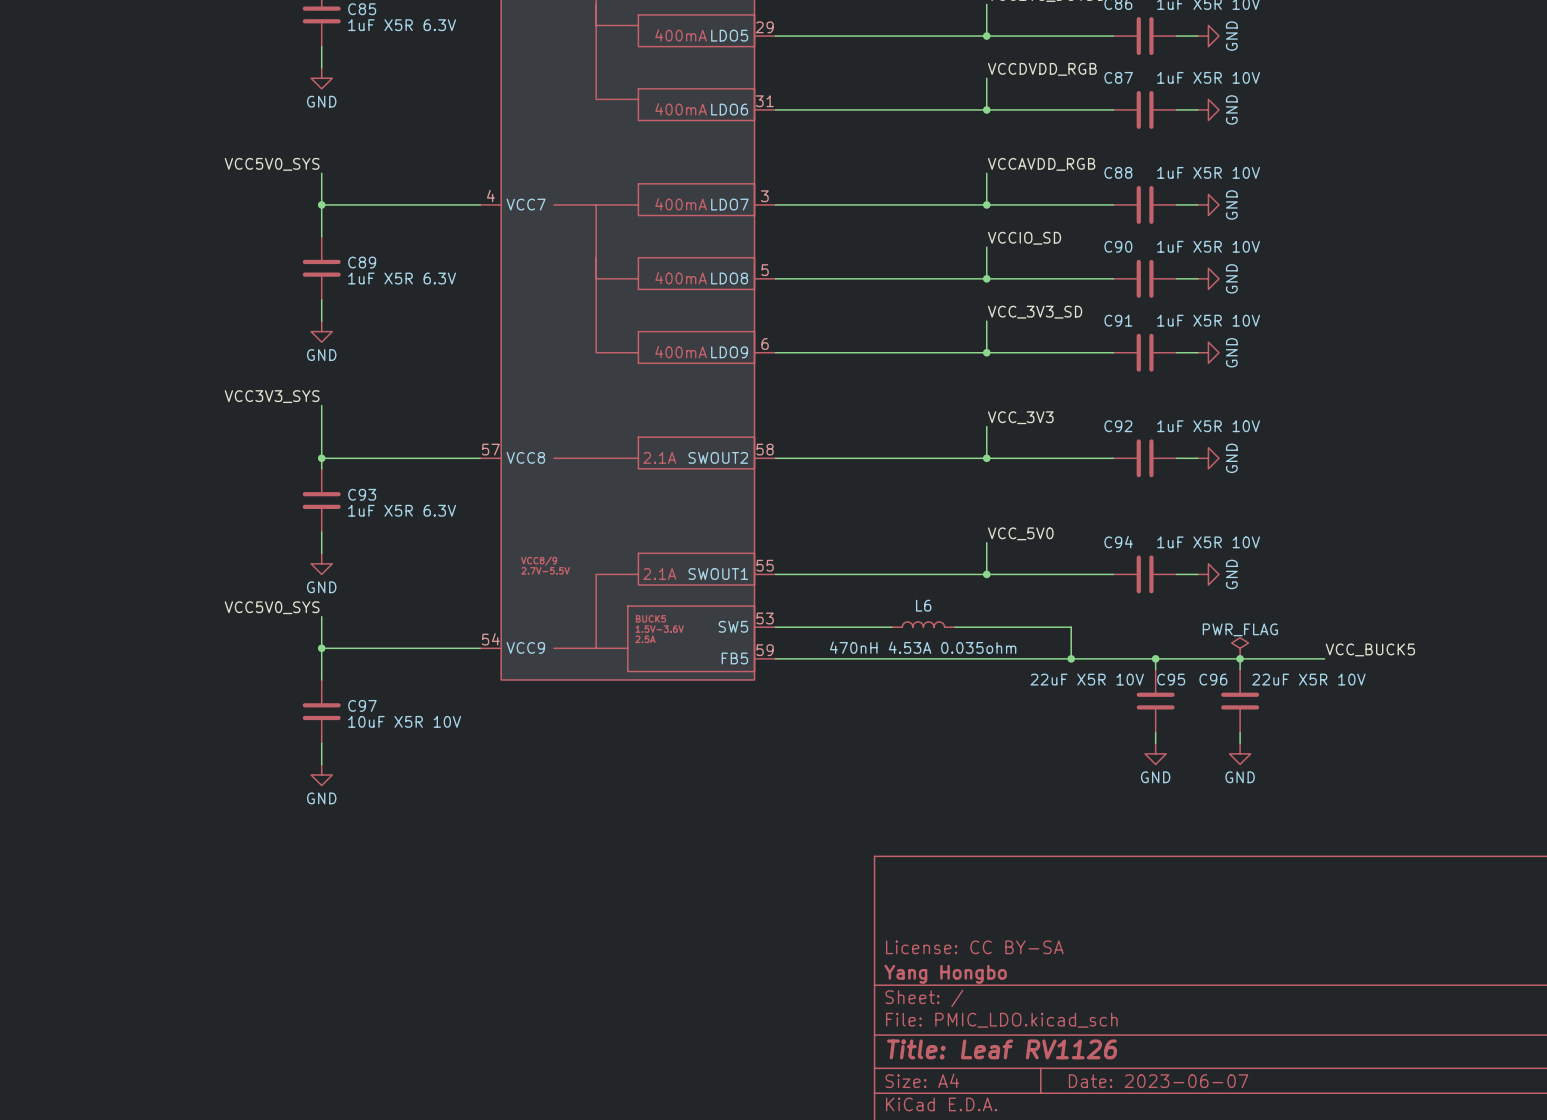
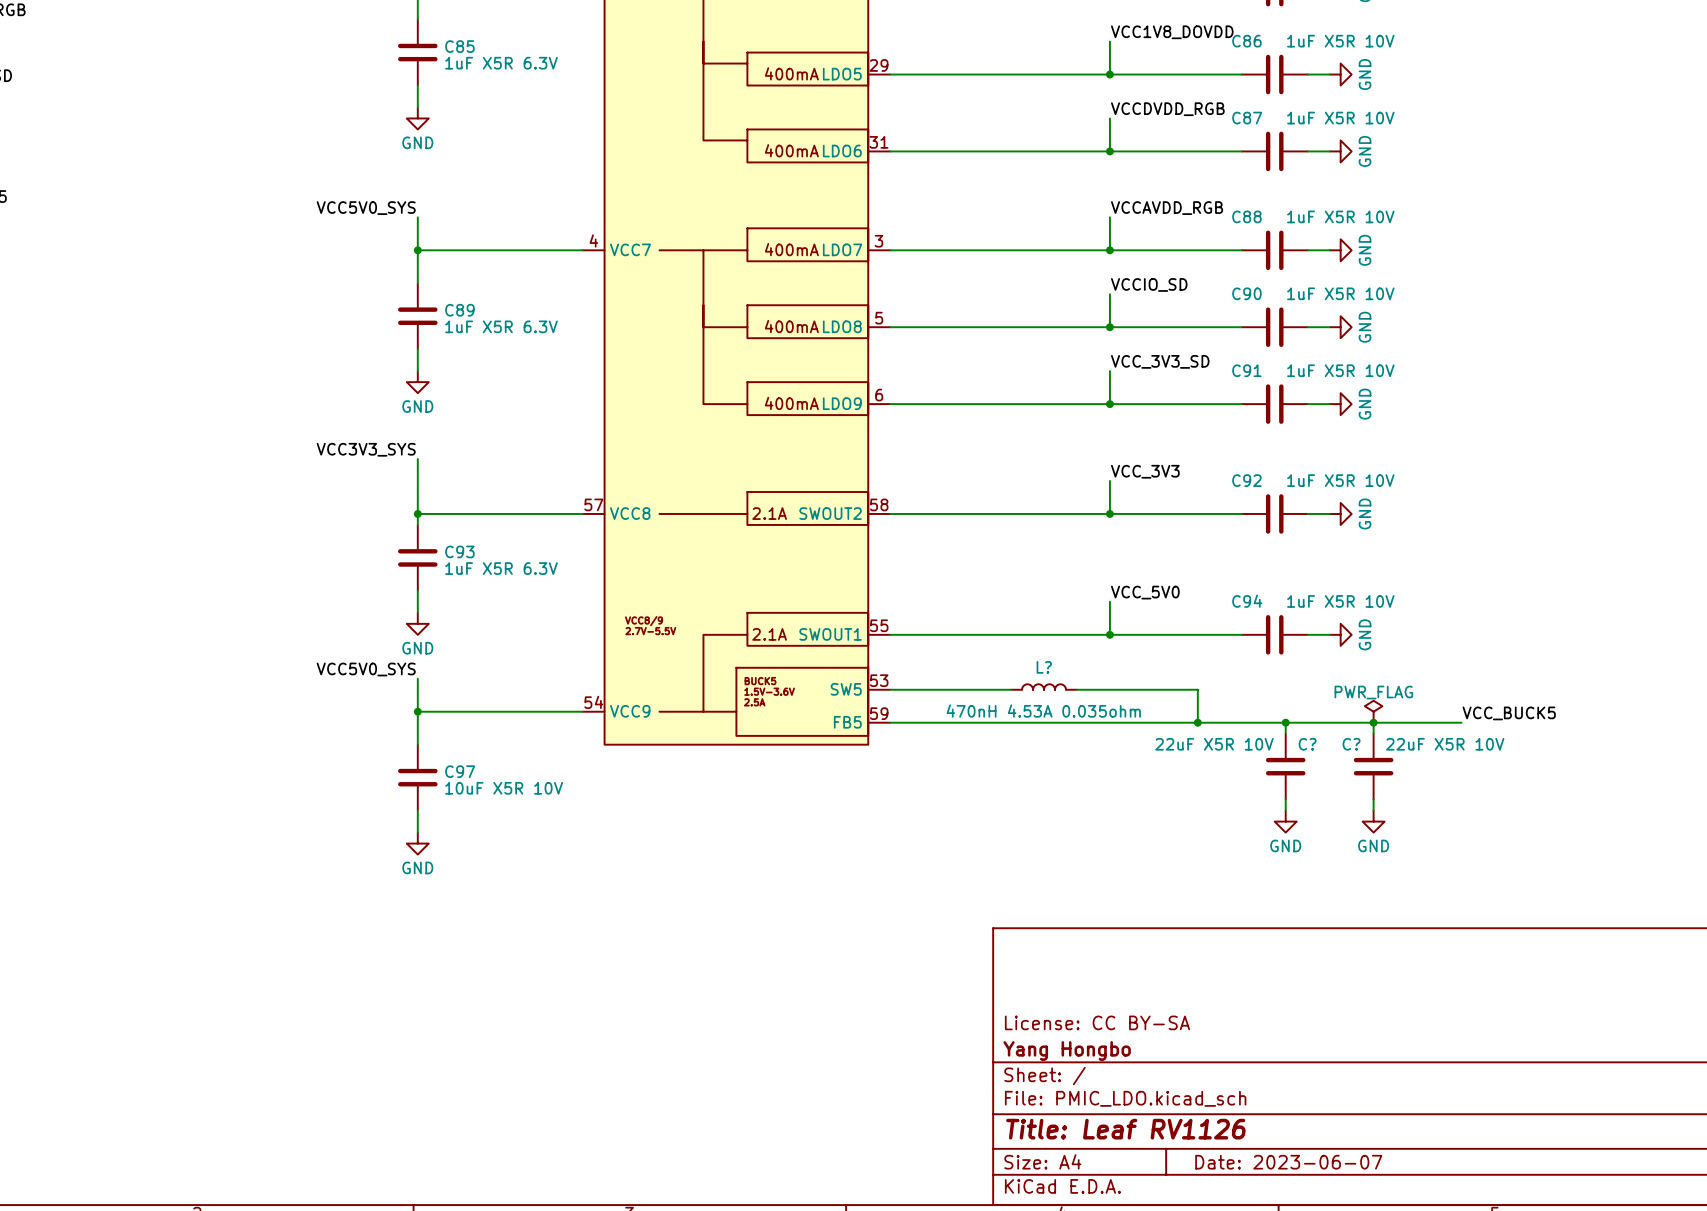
L6 name: L6 (923, 605) -> L? (1044, 667)
C95 name: C95 (1171, 679) -> C? (1307, 744)
C96 name: C96 (1213, 679) -> C? (1351, 744)

